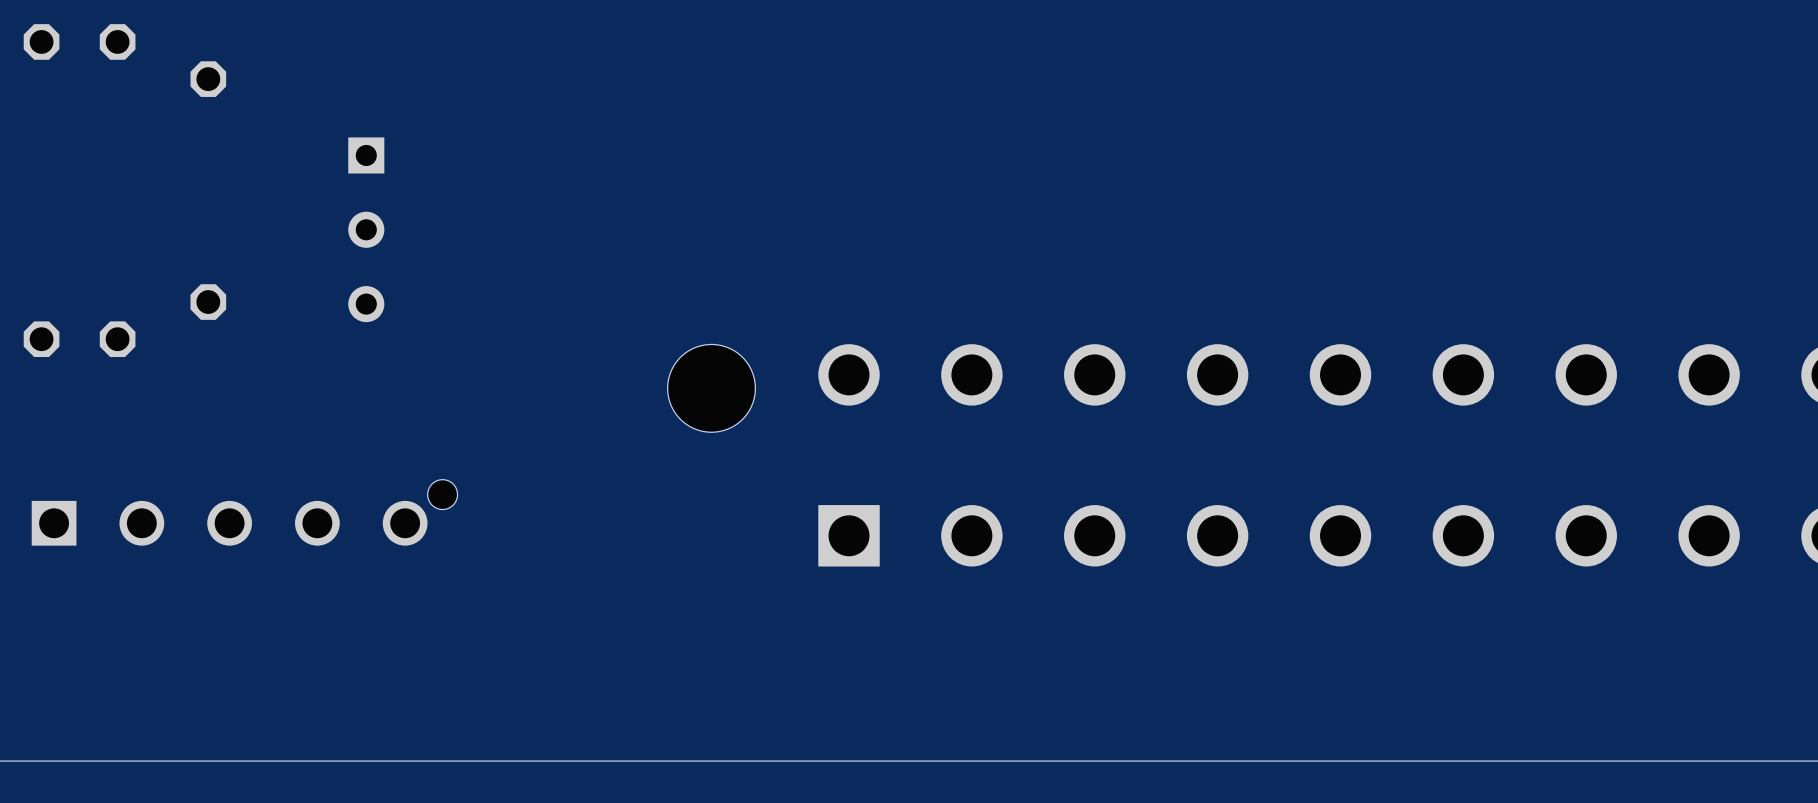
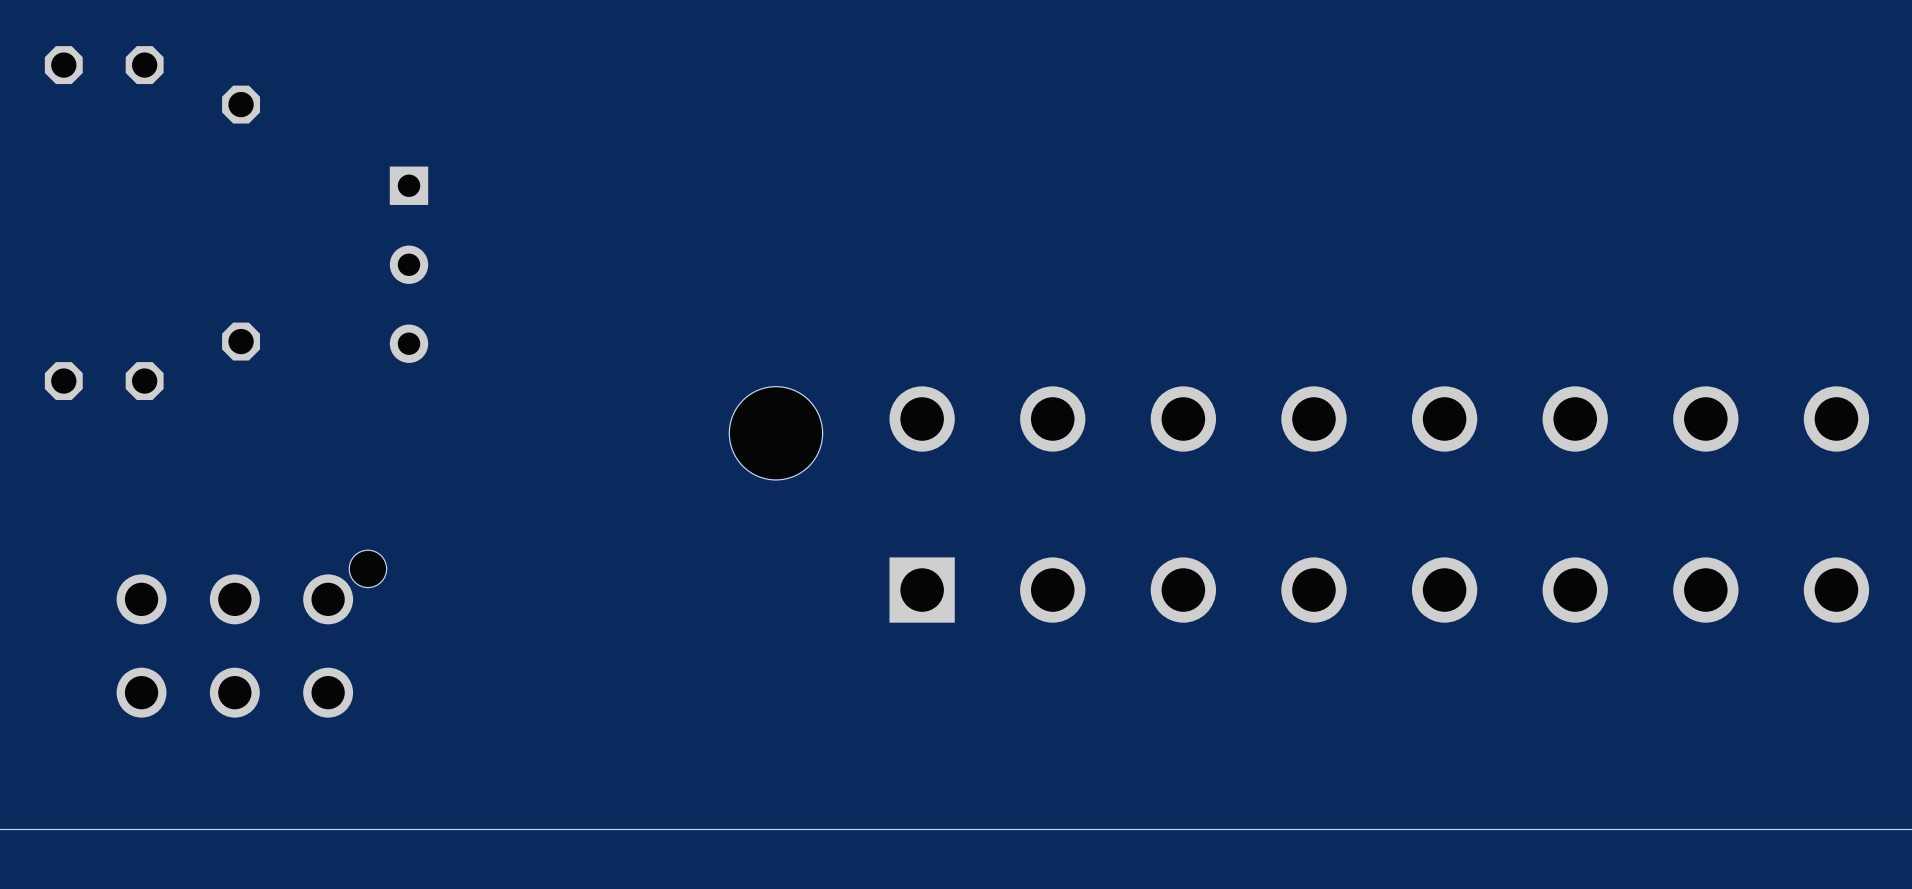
part: (244, 512) -> none
part: none -> (251, 633)

